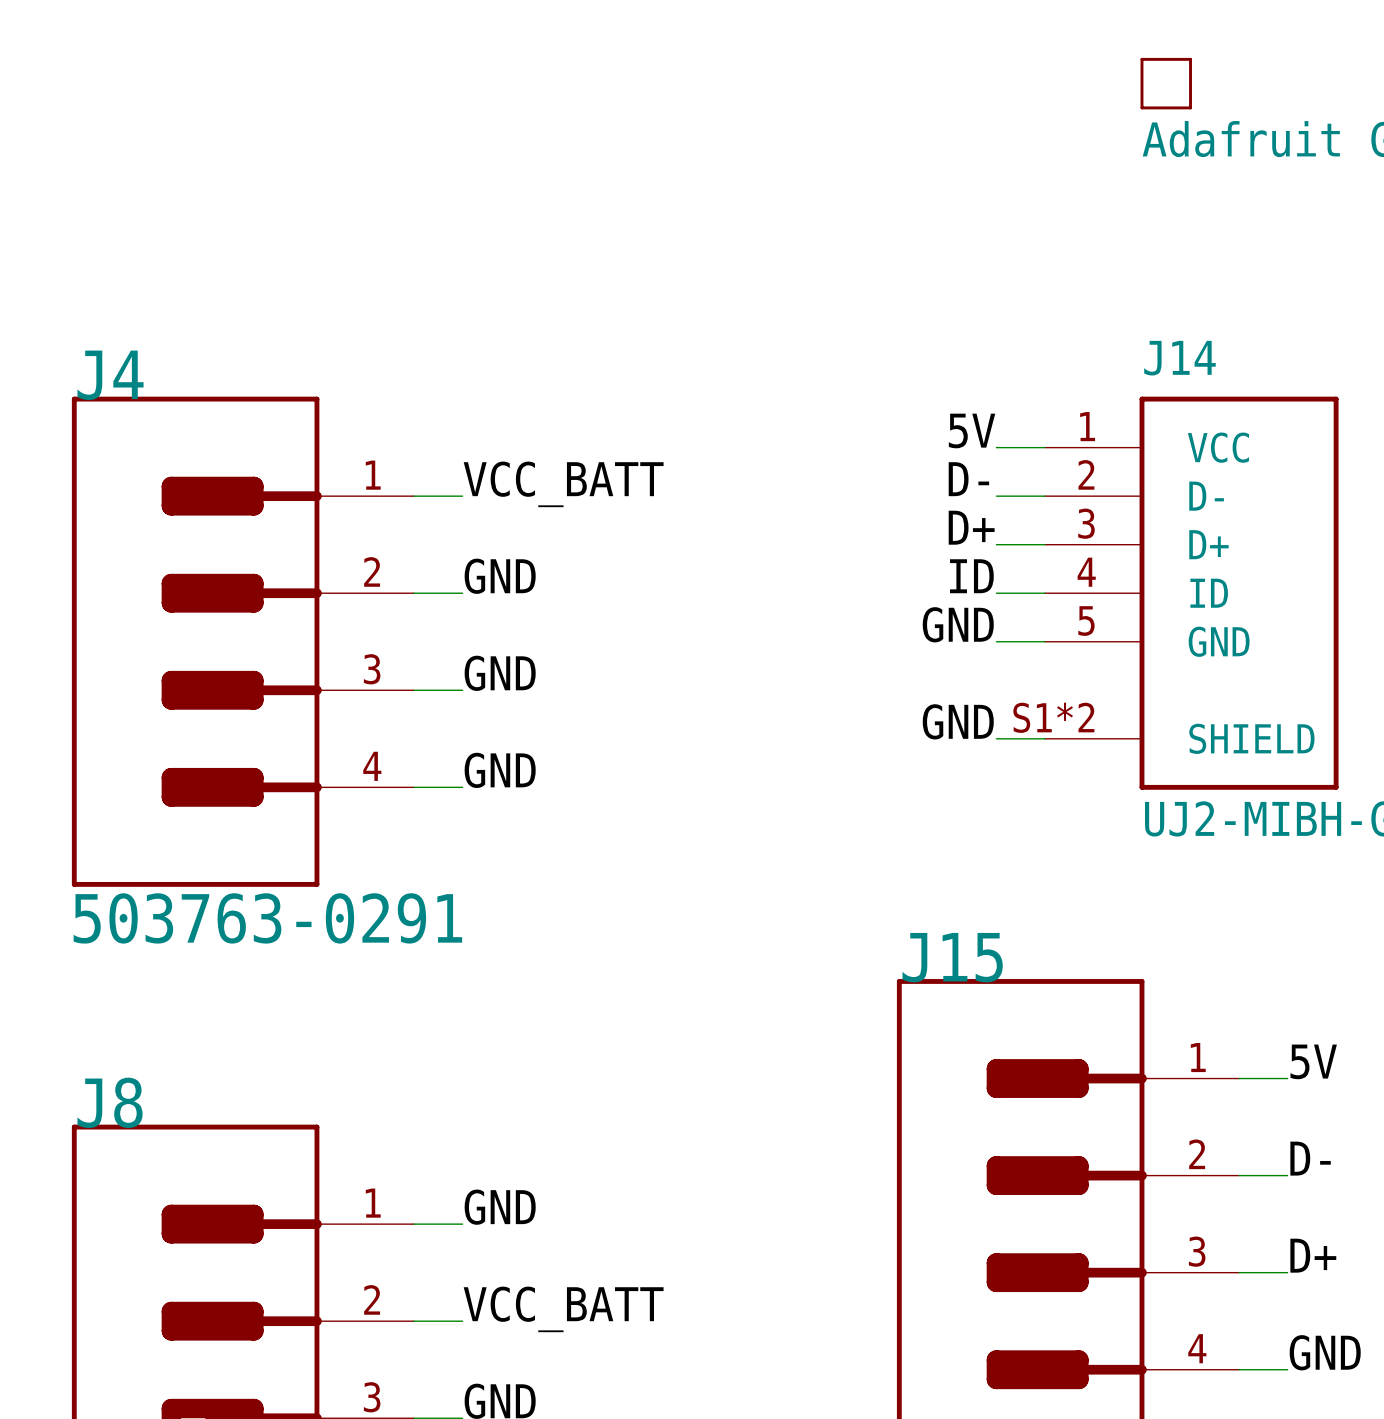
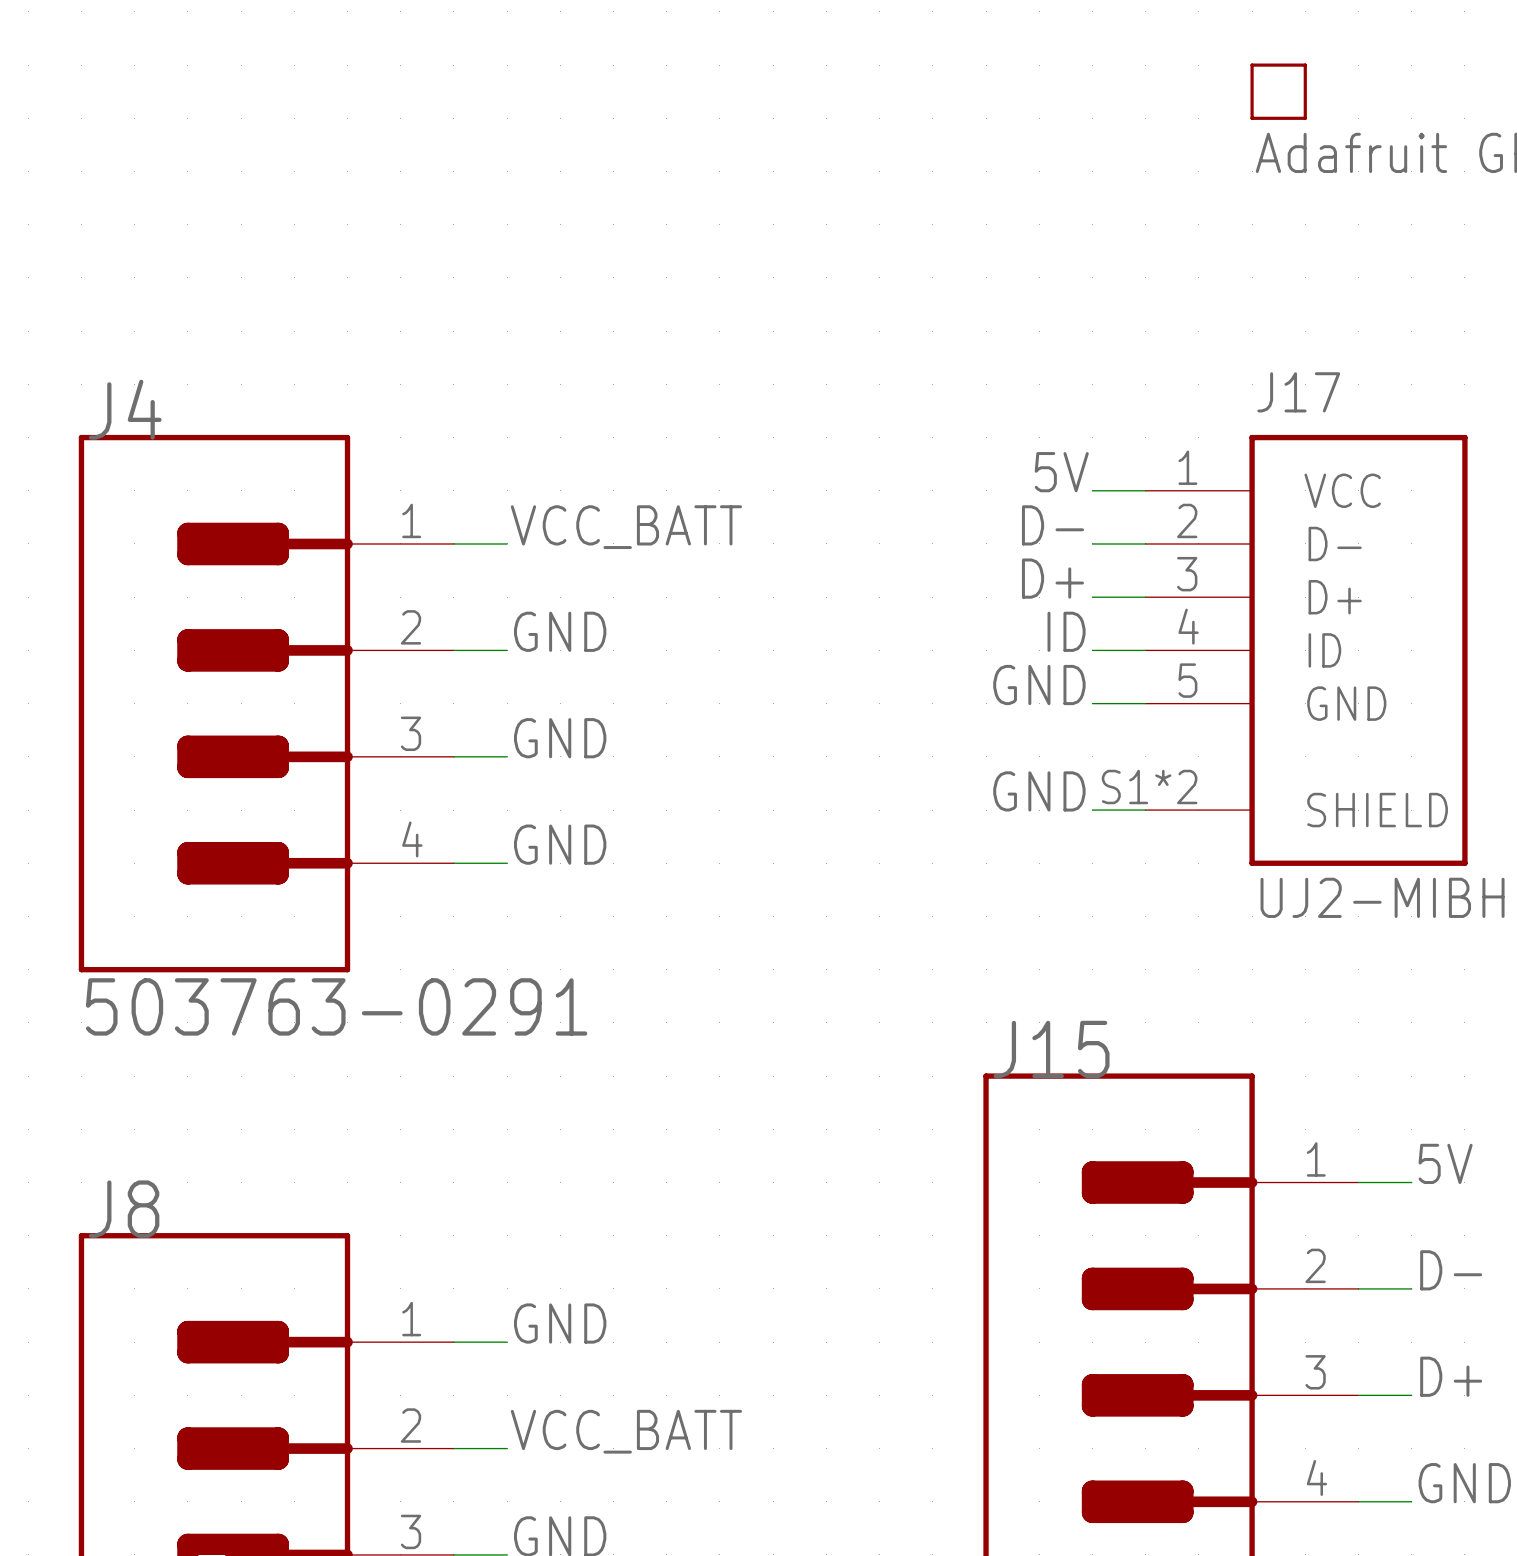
J14 name: J14 (1179, 358) -> J17 (1298, 392)

